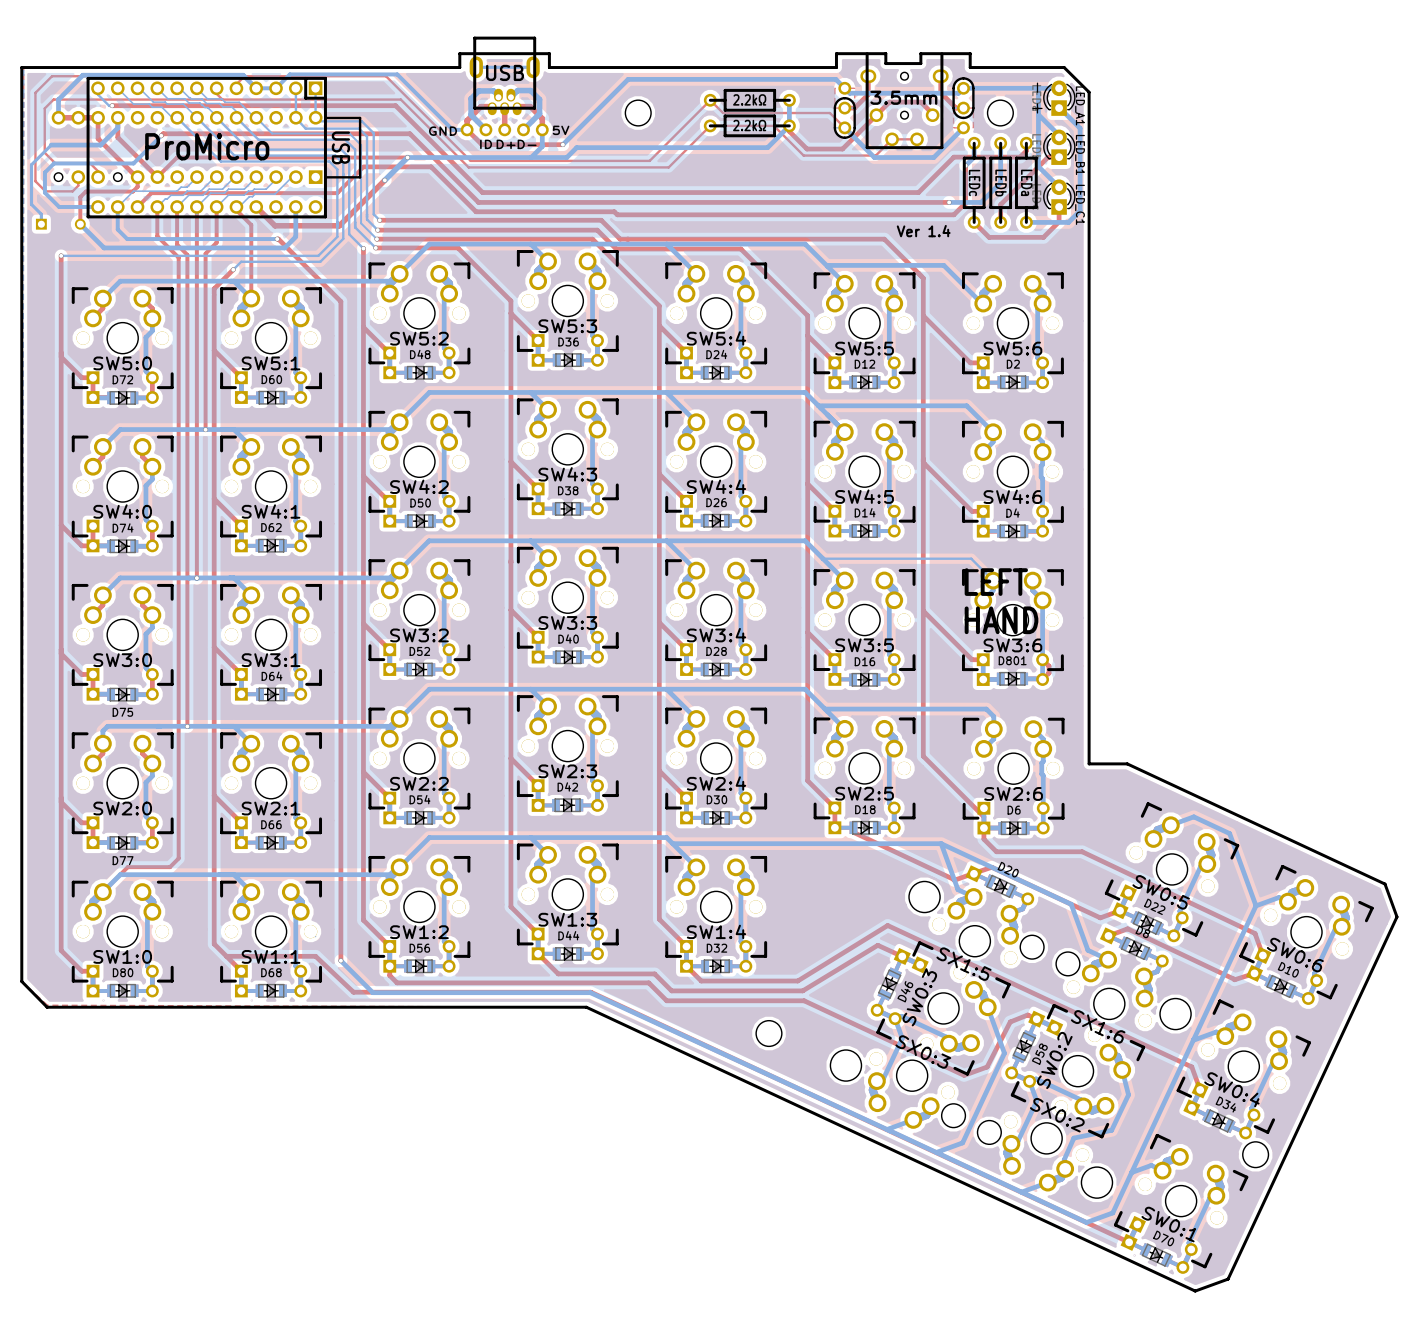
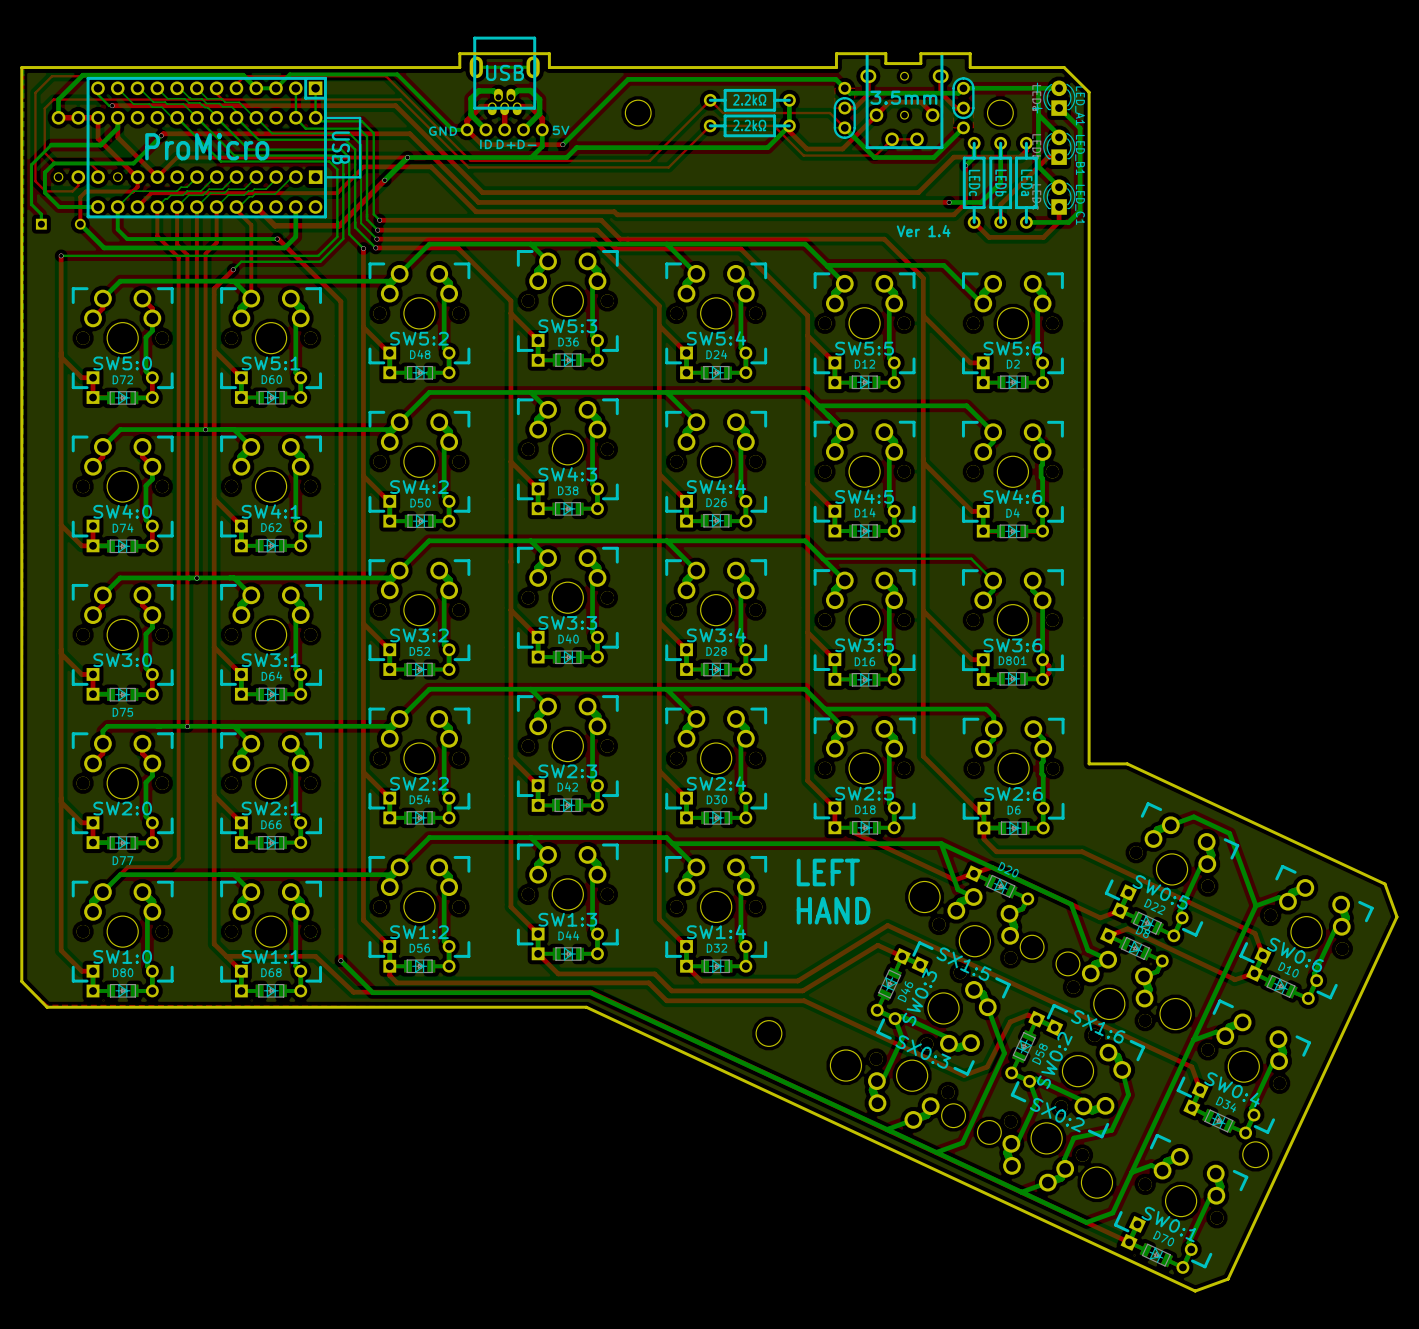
text: LEFT (996, 582) -> none
text: HAND (1001, 620) -> none
text: none -> LEFT (828, 872)
text: none -> HAND (833, 910)

